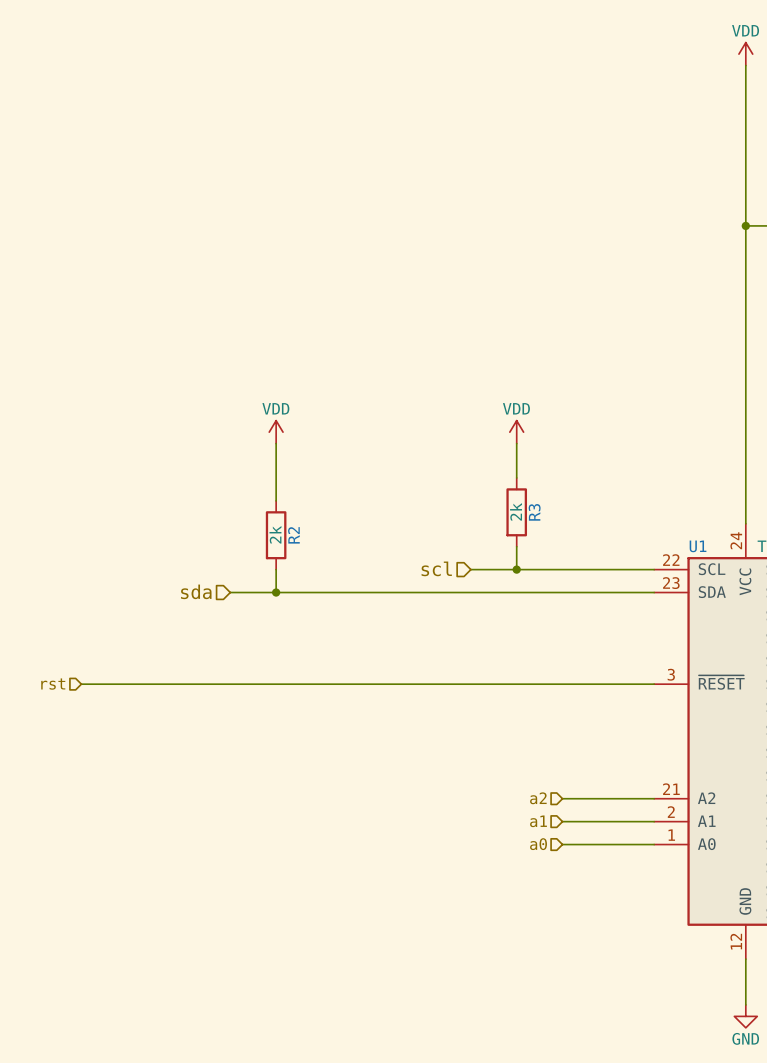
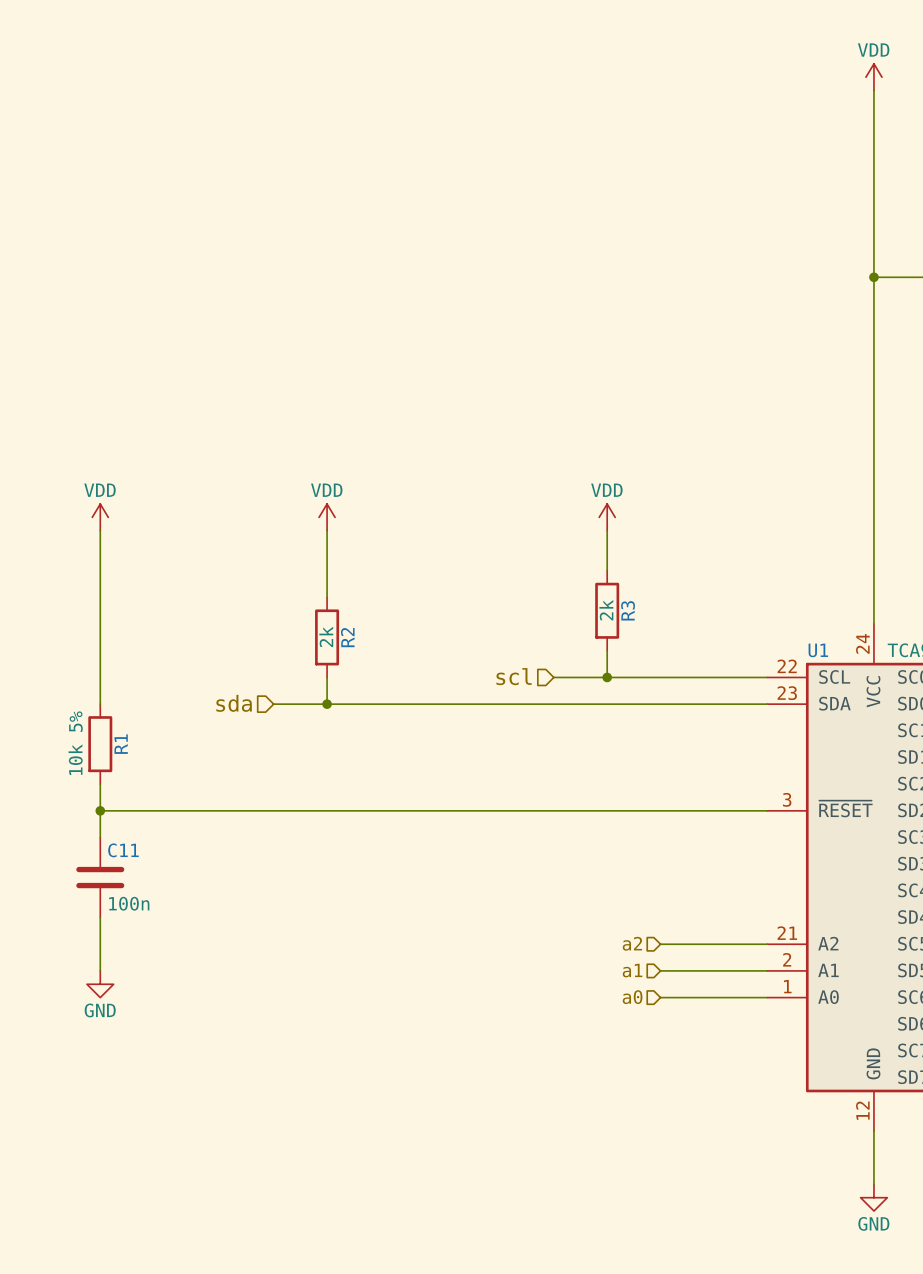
power symbol: none -> VDD (100, 517)
wire: none -> (100, 530) (100, 704)
R1: none -> 10k 5% (100, 744)
wire: none -> (100, 784) (100, 837)
hierarchical label: rst (53, 684) -> none
junction: none -> (100, 810)
C11: none -> 100n (100, 877)
wire: none -> (100, 917) (100, 970)
power symbol: none -> GND (100, 984)

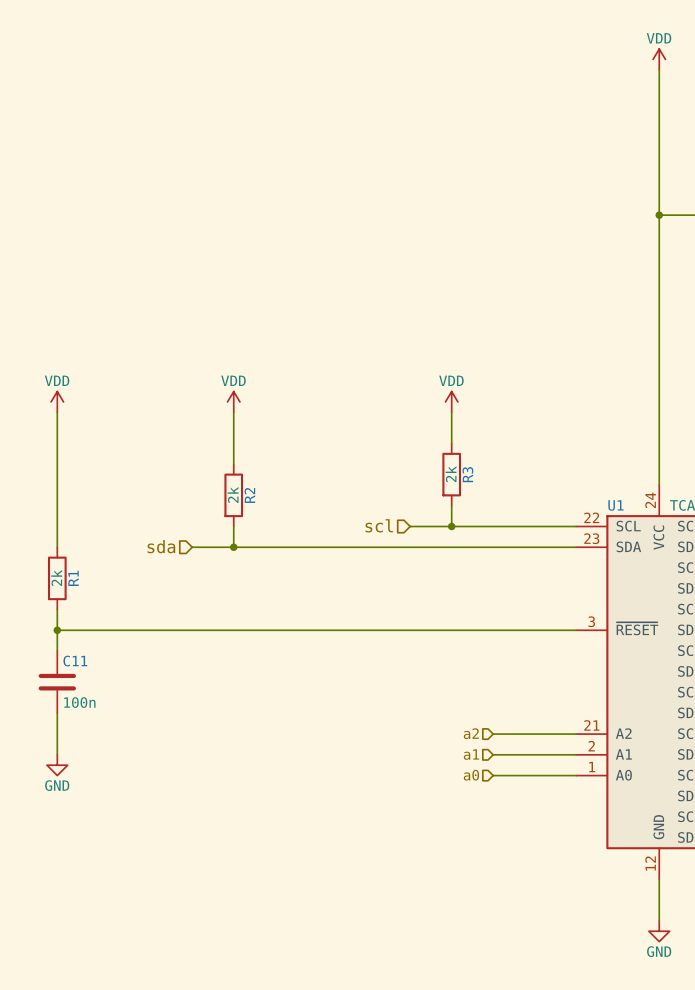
R1 value: 10k 5% (75, 743) -> 2k (56, 577)

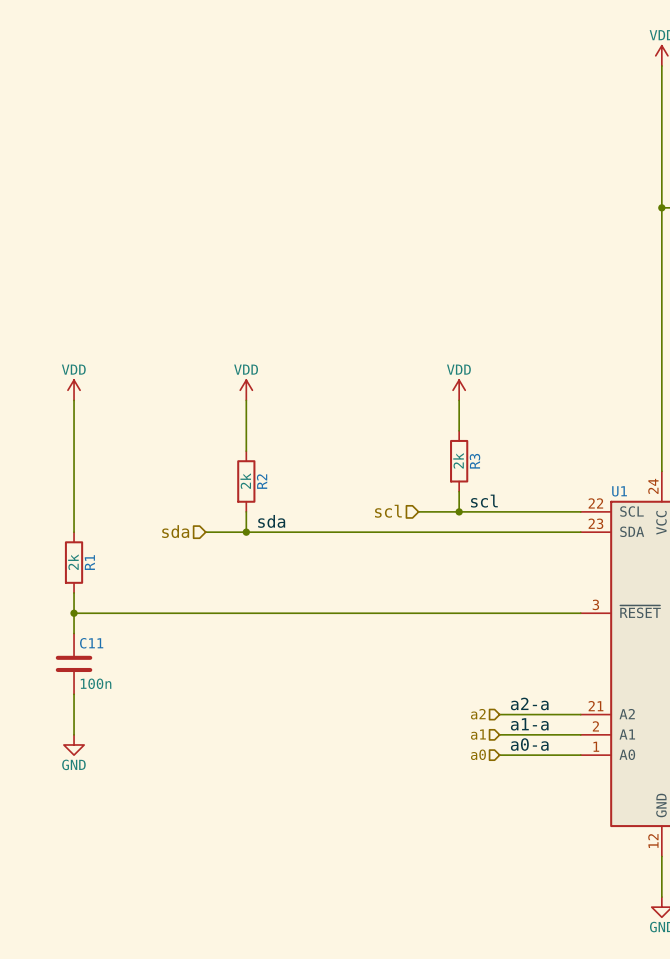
label: none -> scl (484, 501)
label: none -> sda (271, 521)
label: none -> a2-a (529, 703)
label: none -> a1-a (529, 724)
label: none -> a0-a (529, 744)

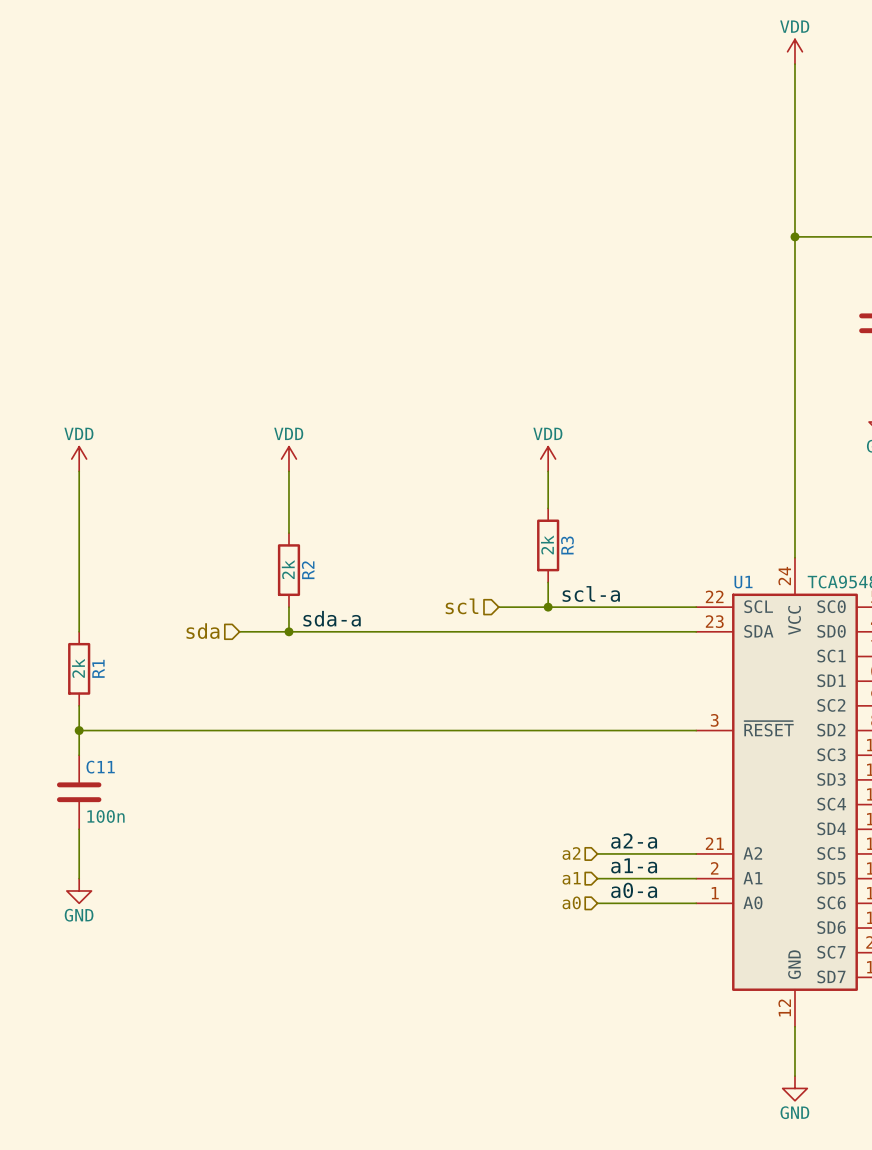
label: scl (484, 501) -> scl-a (591, 593)
label: sda (271, 521) -> sda-a (332, 618)

